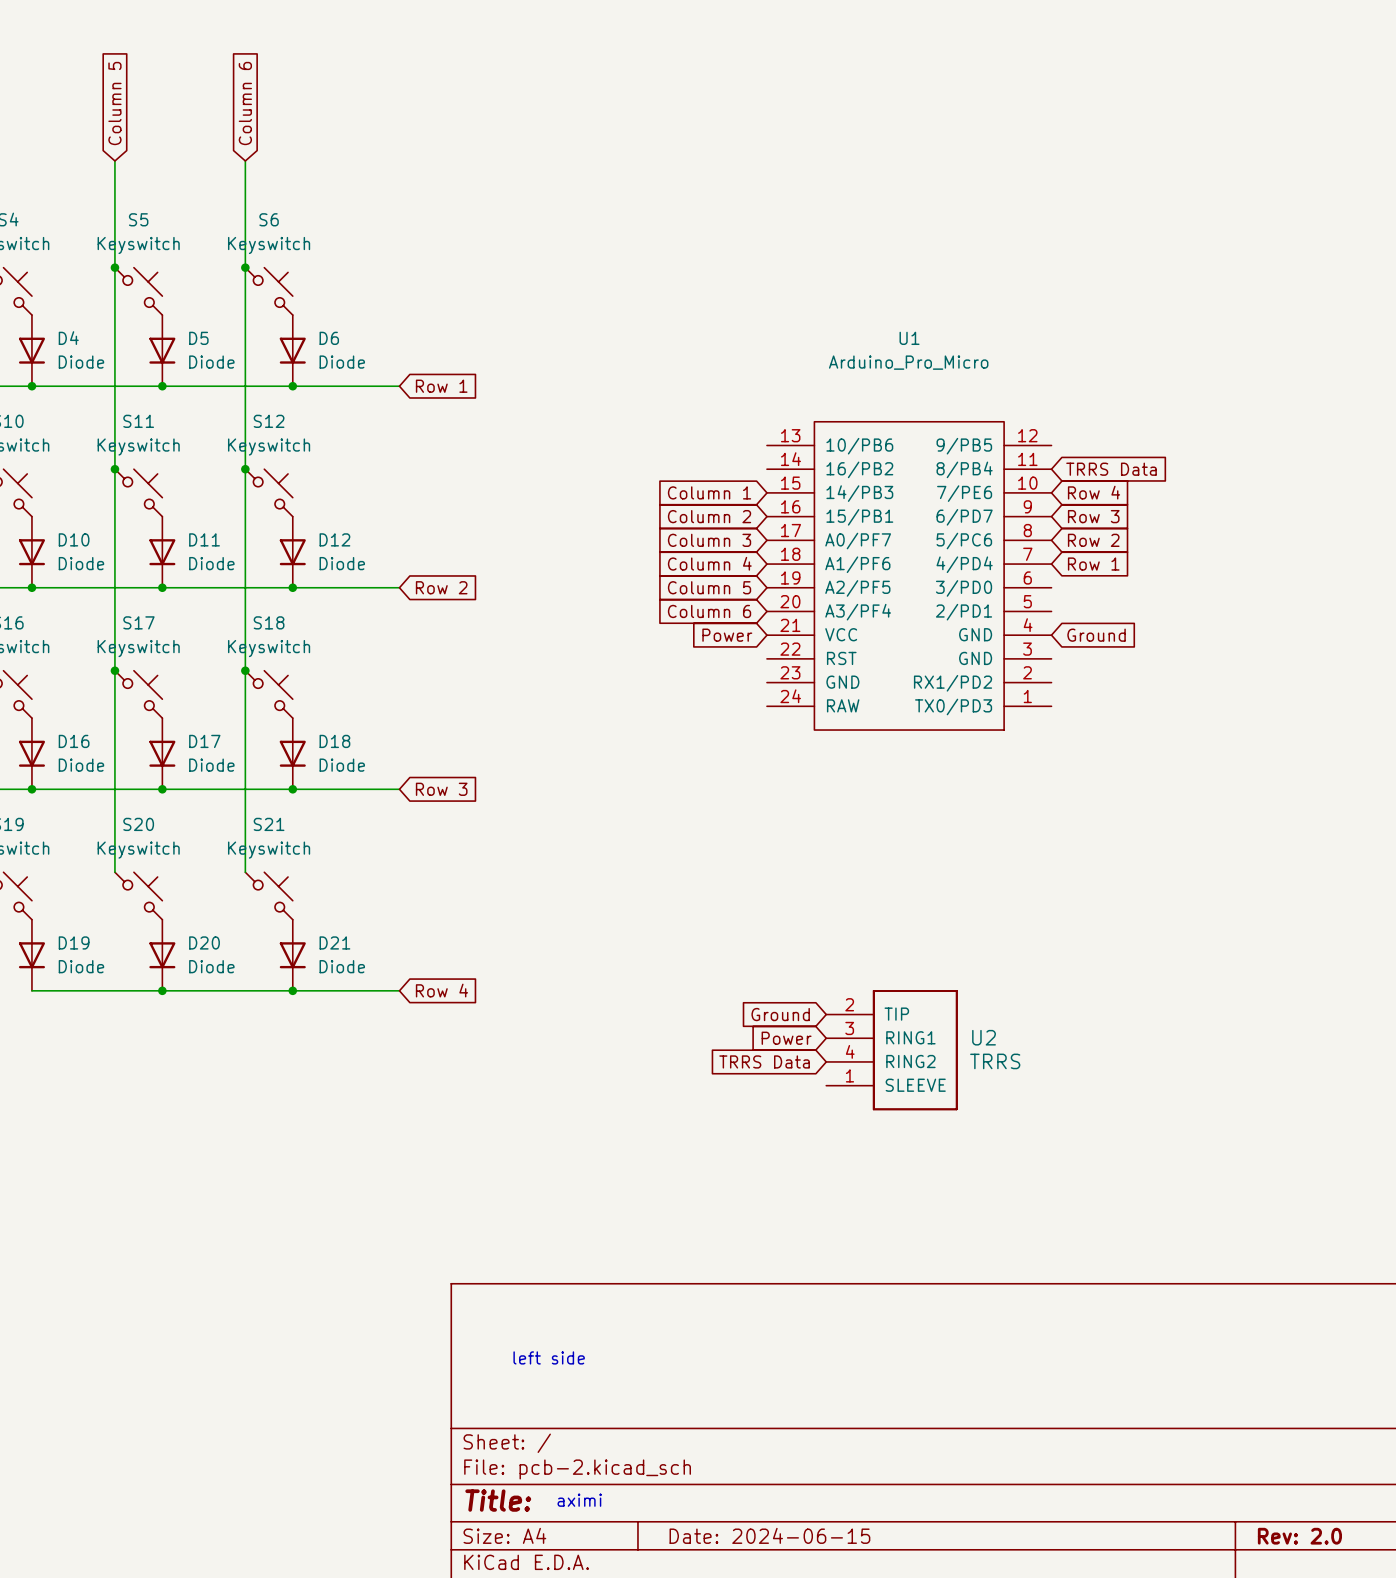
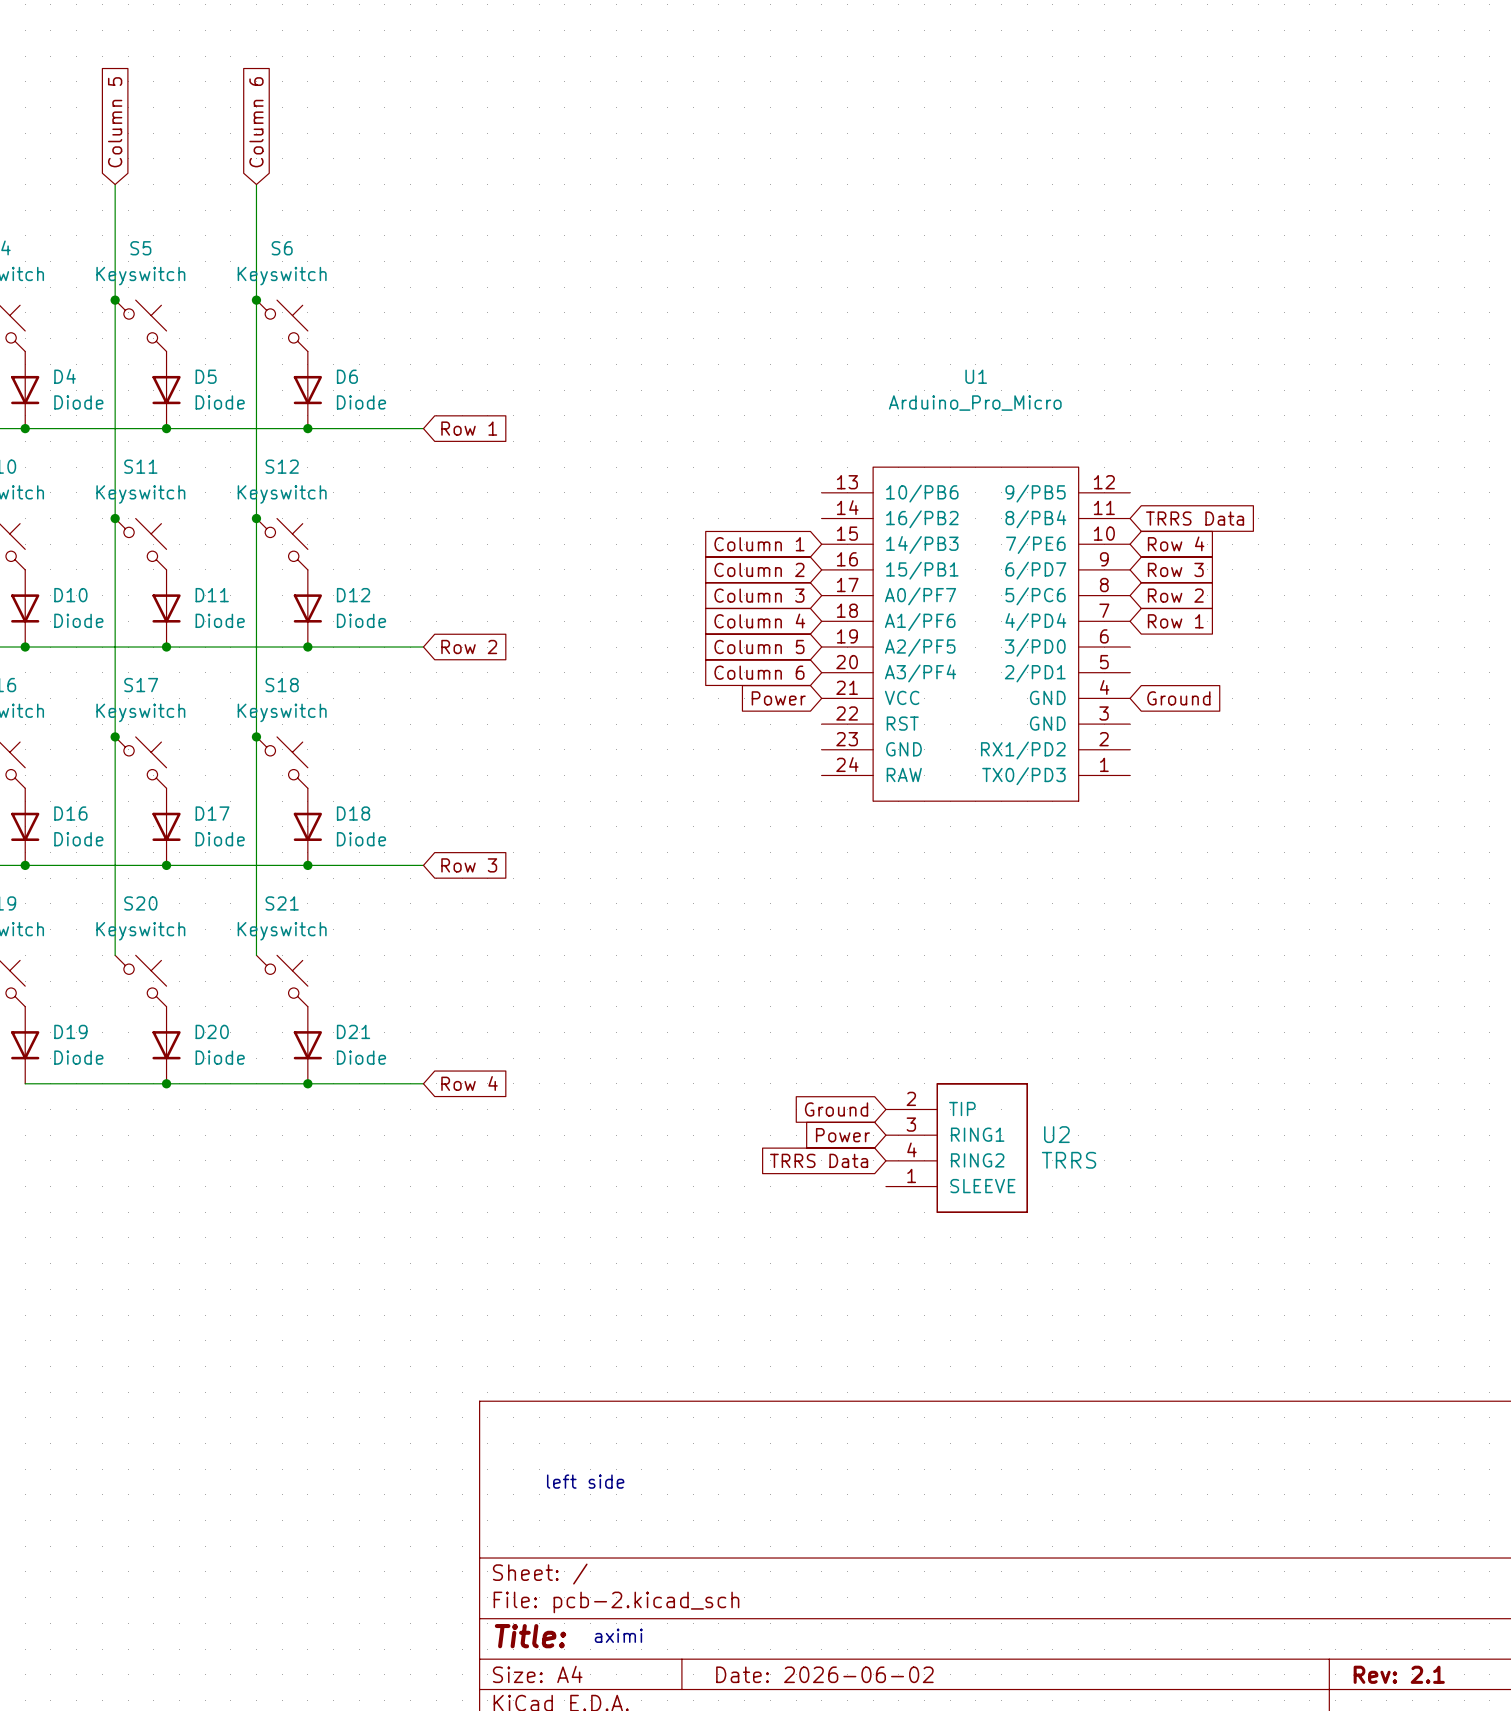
title block: Date: 2024-06-15 (769, 1535) -> Date: 2026-06-02 (824, 1674)
title block: Rev: 2.0 (1299, 1536) -> Rev: 2.1 (1399, 1674)

